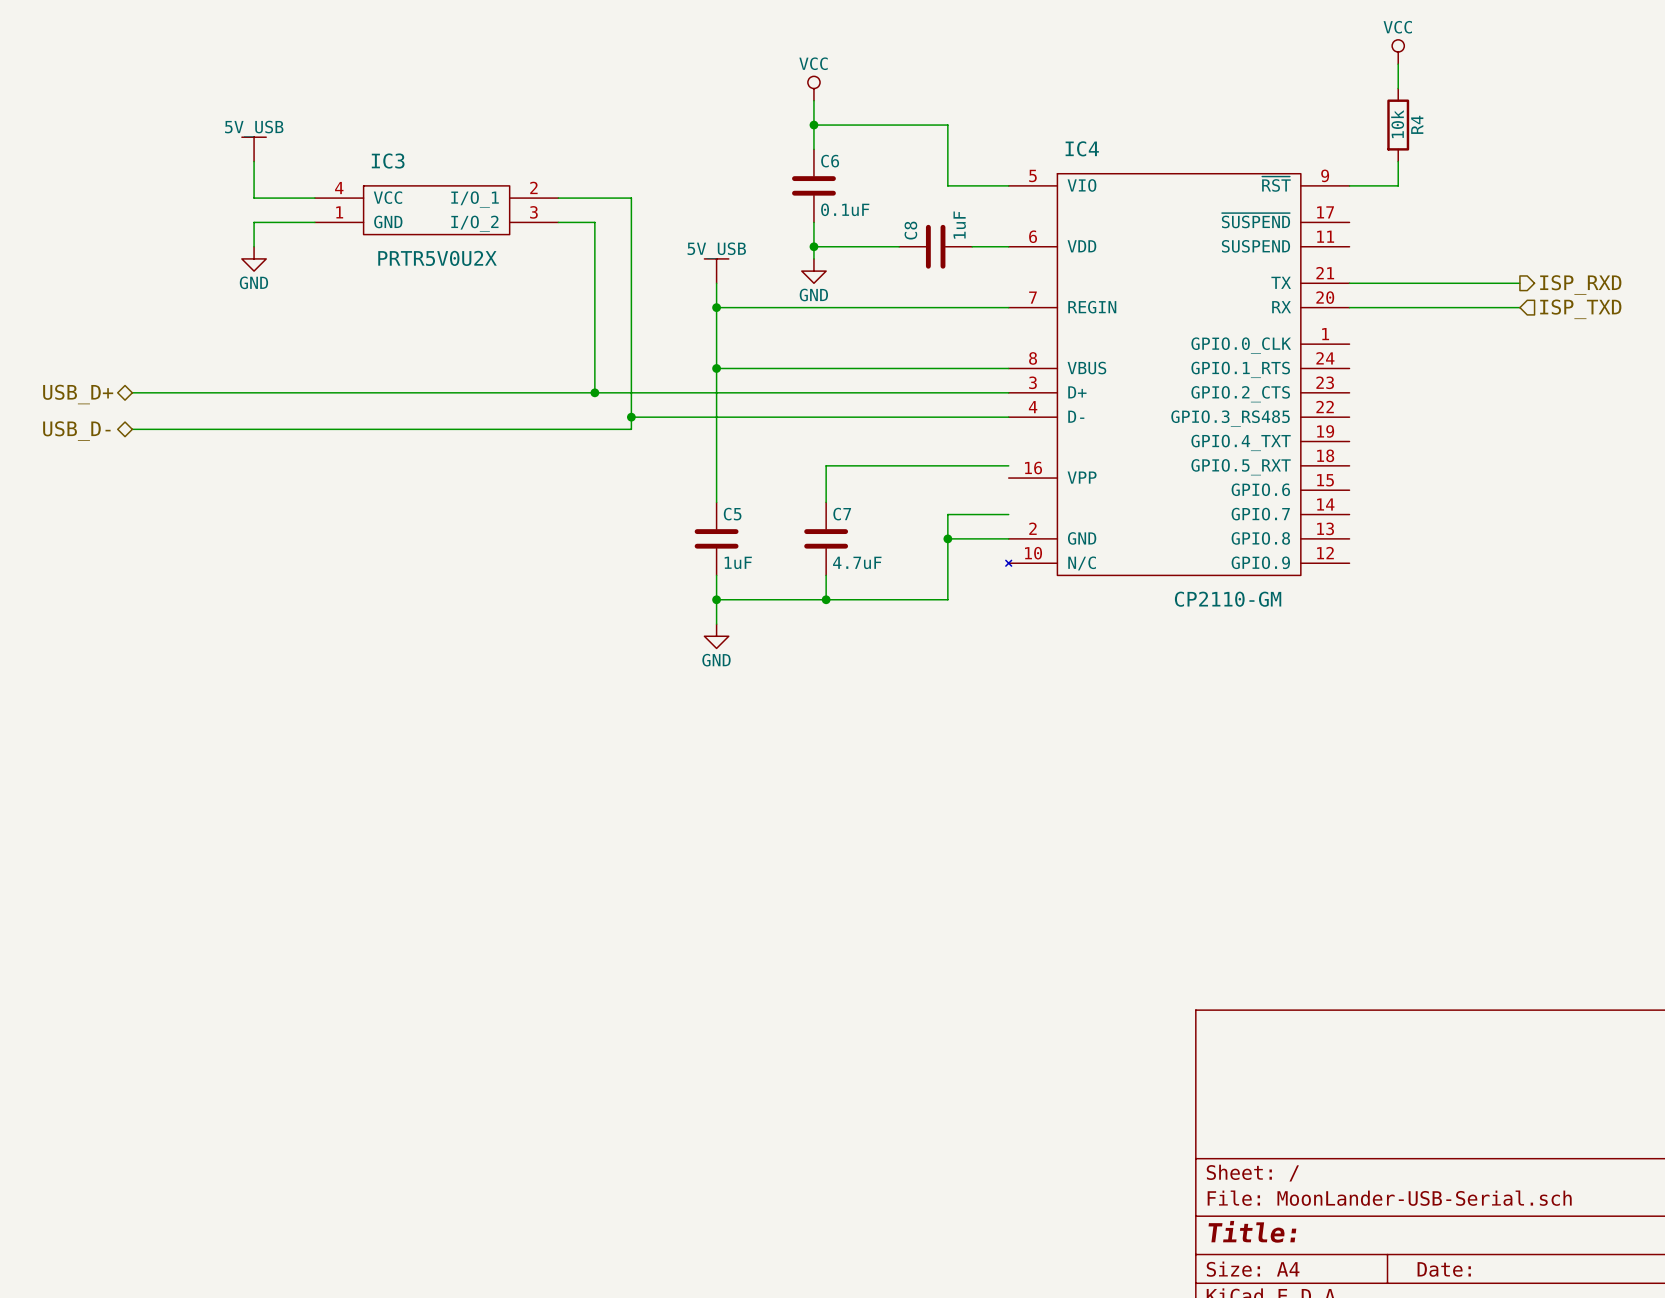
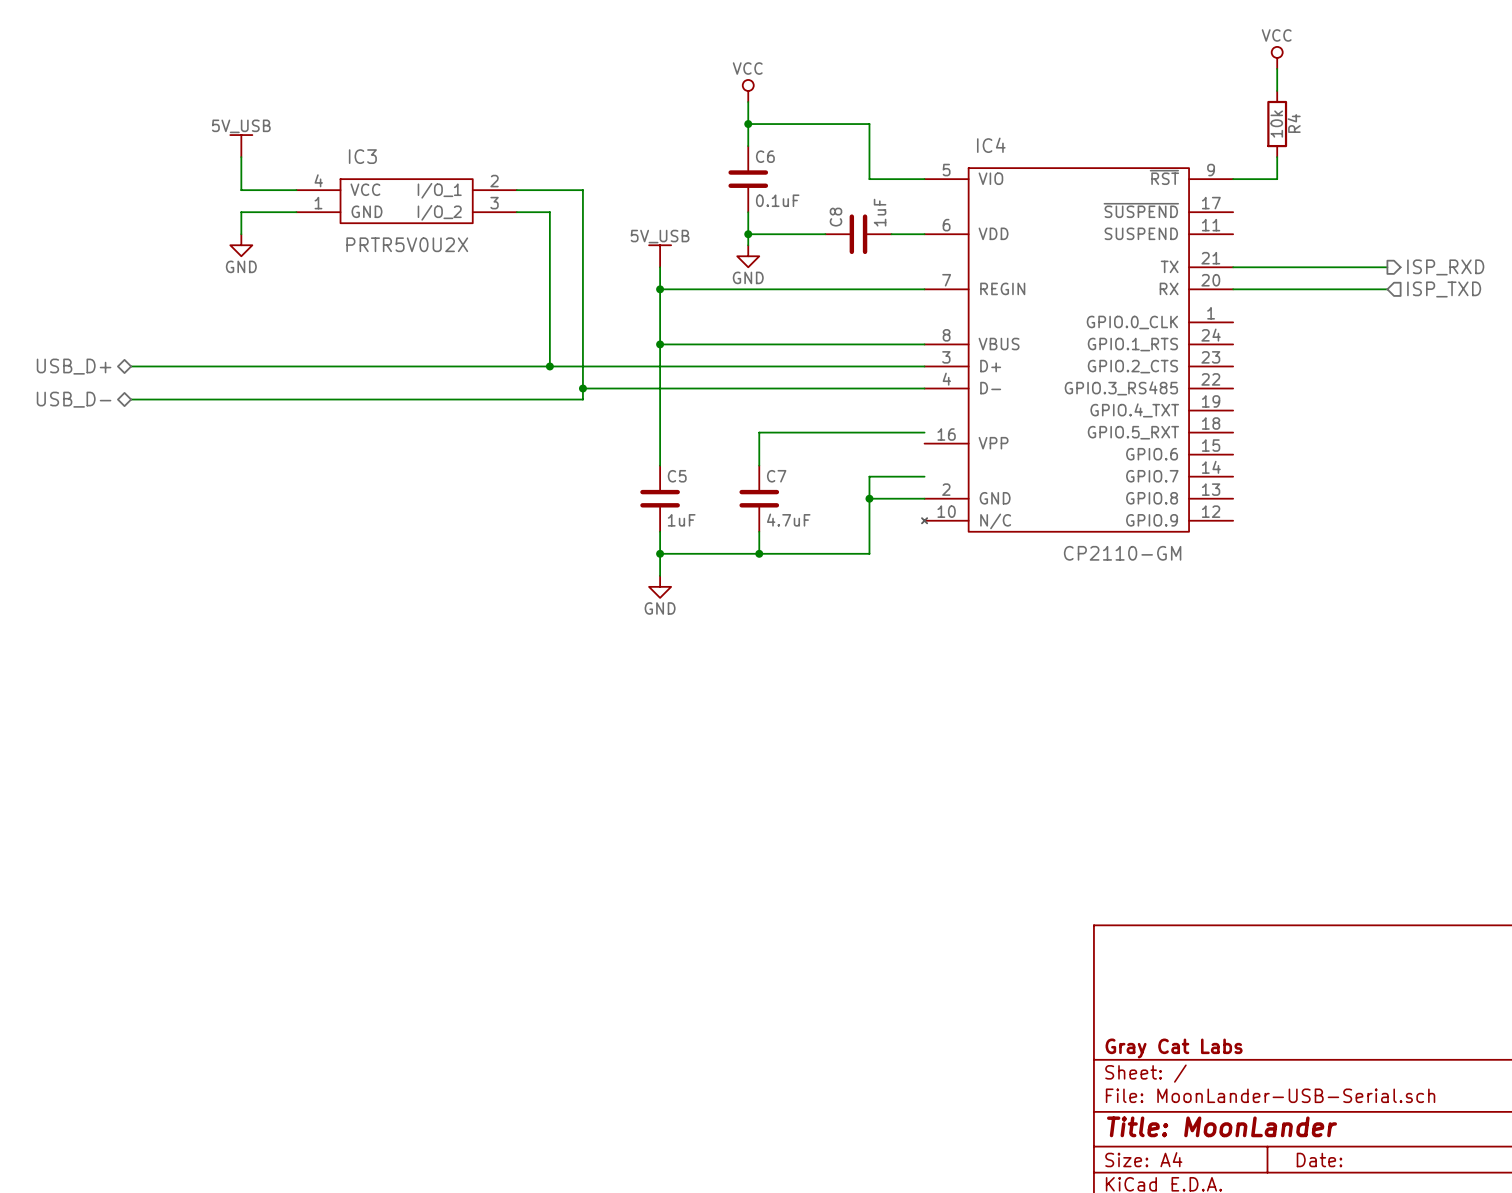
title block: none -> Gray Cat Labs (1174, 1048)
title block: Title: (1252, 1231) -> Title: MoonLander (1222, 1126)

